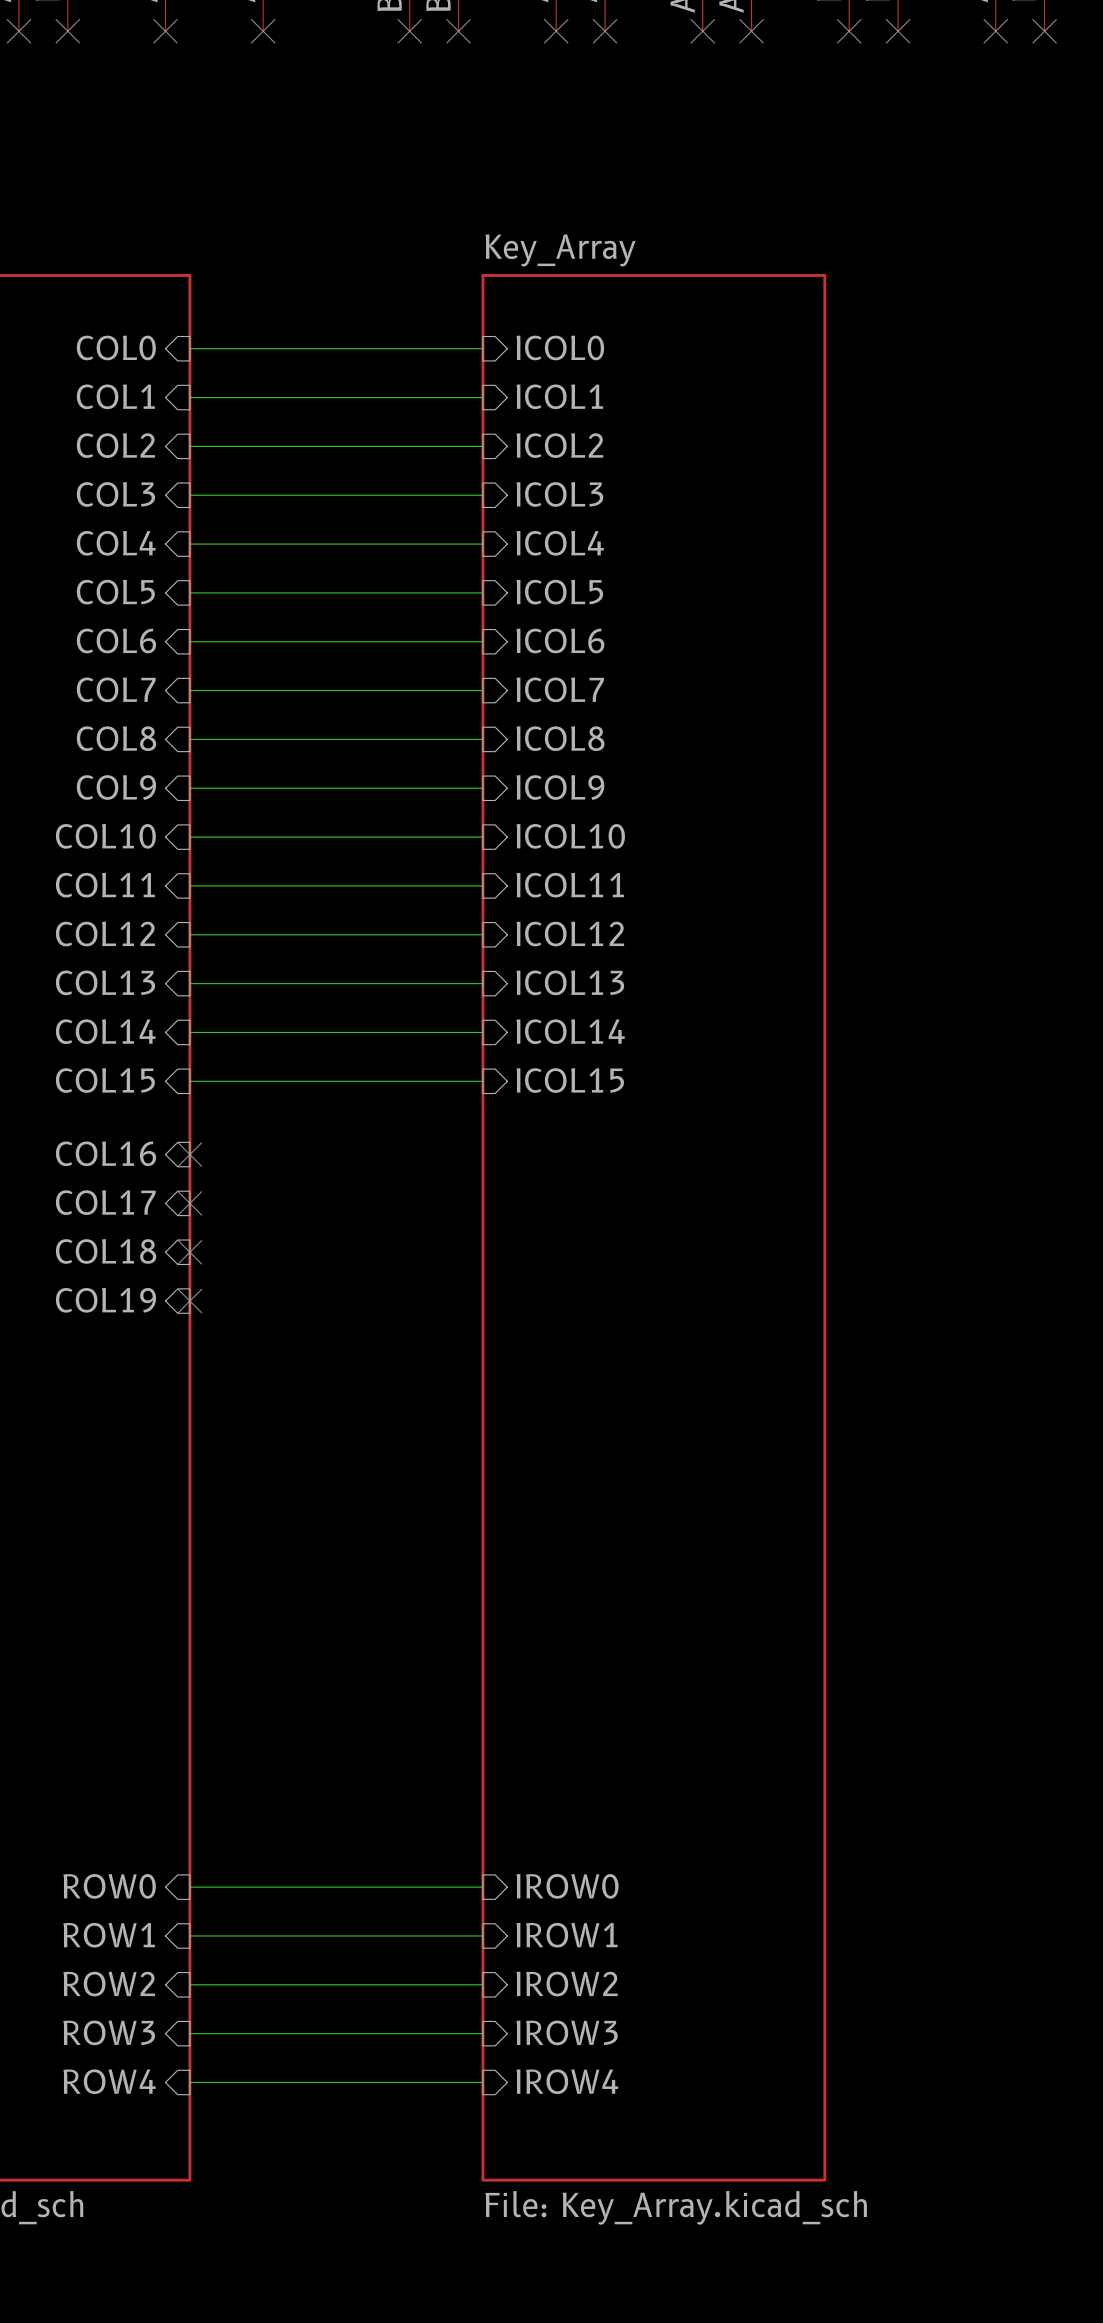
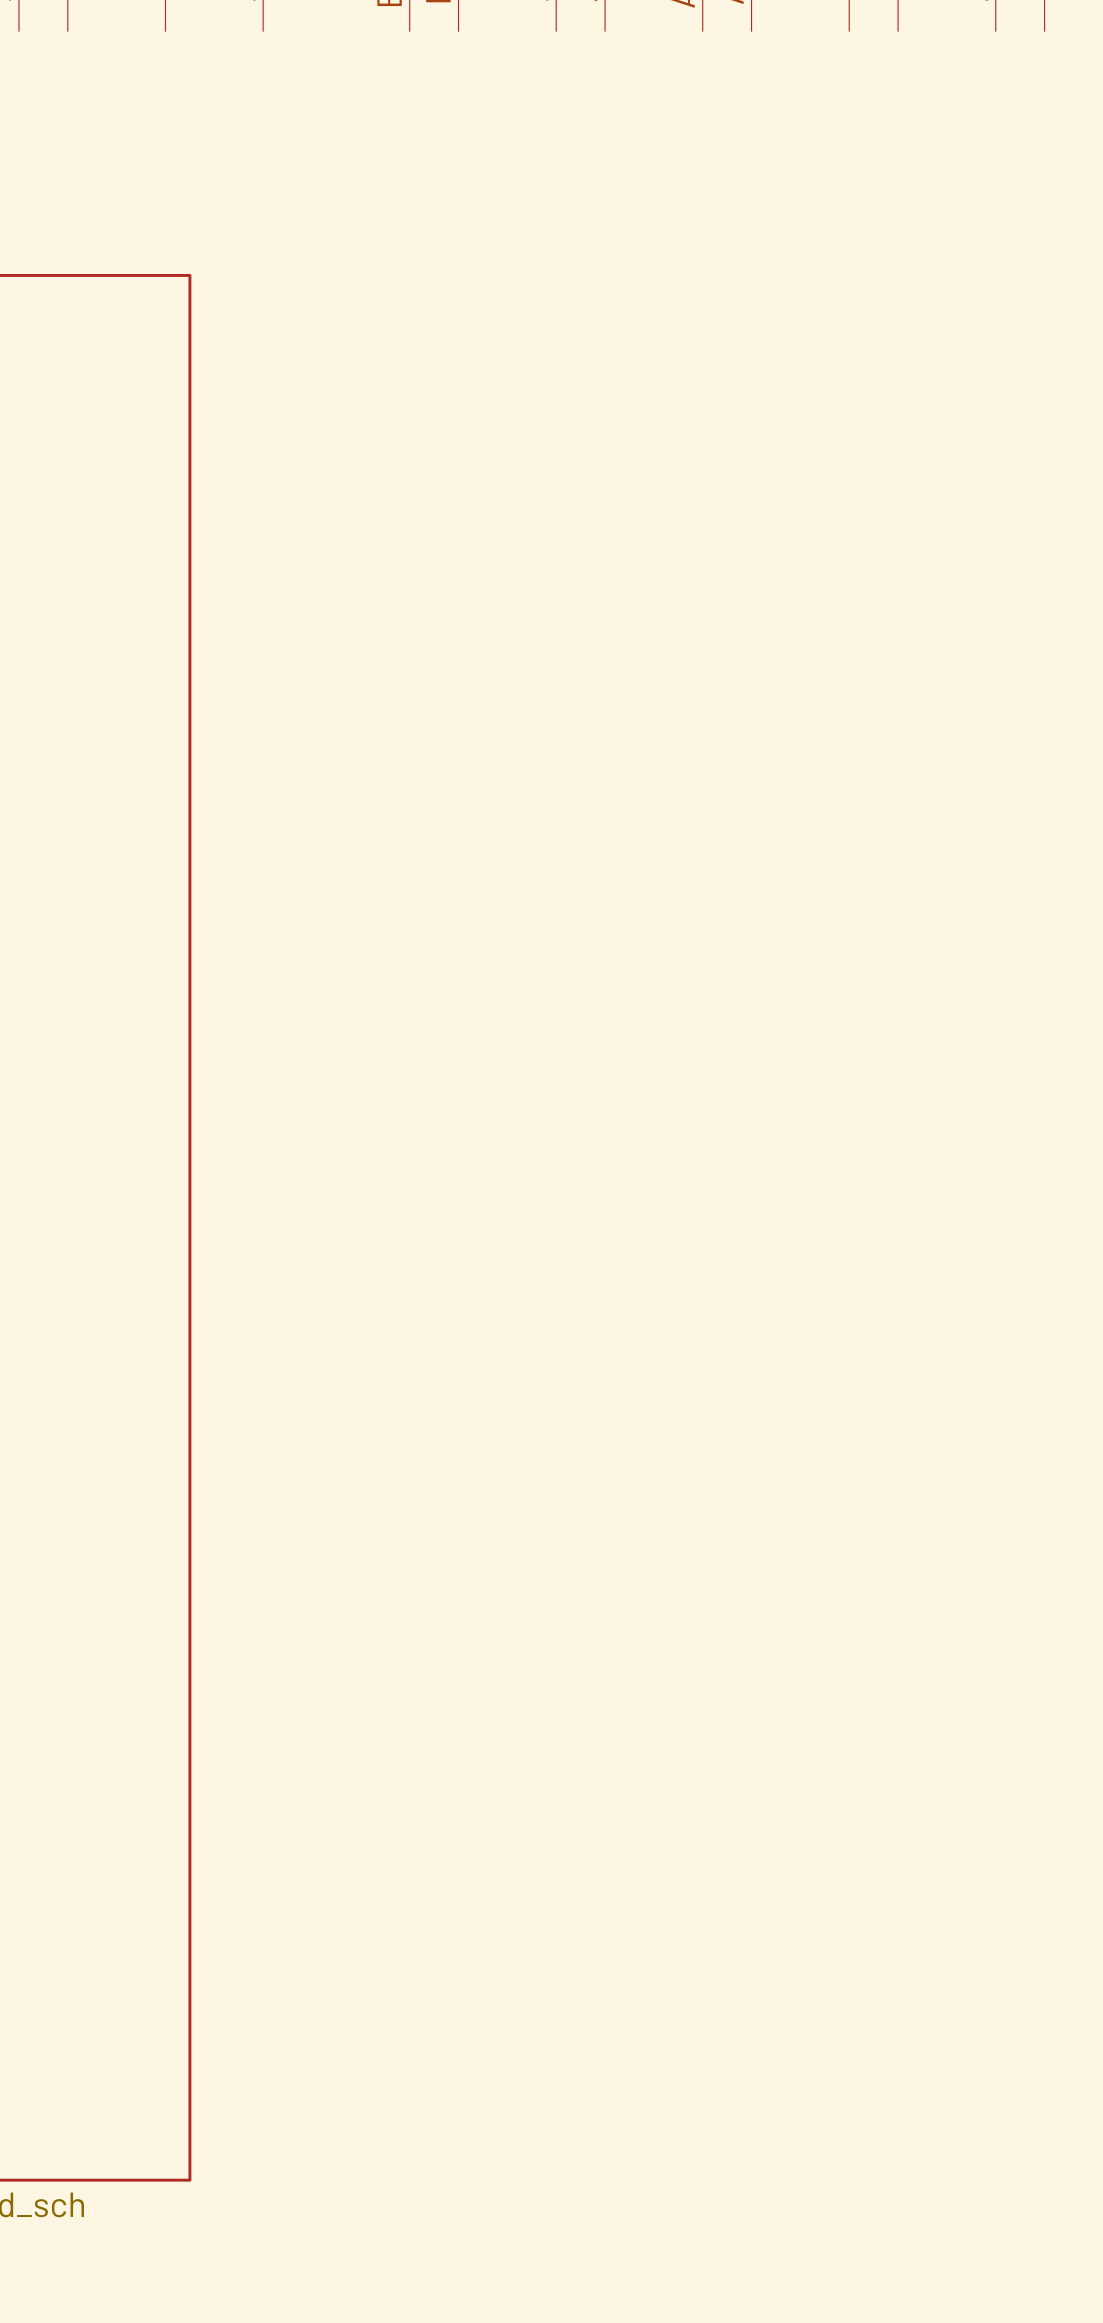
no-connect mark: (18, 31) -> none
no-connect mark: (67, 31) -> none
no-connect mark: (165, 31) -> none
no-connect mark: (263, 31) -> none
no-connect mark: (409, 31) -> none
no-connect mark: (458, 31) -> none
no-connect mark: (556, 31) -> none
no-connect mark: (605, 31) -> none
no-connect mark: (702, 31) -> none
no-connect mark: (751, 31) -> none
no-connect mark: (849, 31) -> none
no-connect mark: (898, 31) -> none
no-connect mark: (995, 31) -> none
no-connect mark: (1044, 31) -> none
sheet pin: COL0 (116, 347) -> none
sheet pin: ICOL0 (560, 347) -> none
wire: (189, 348) (482, 348) -> none
sheet pin: COL1 (115, 396) -> none
sheet pin: ICOL1 (559, 396) -> none
wire: (189, 397) (482, 397) -> none
sheet pin: COL2 (115, 445) -> none
sheet pin: ICOL2 (559, 445) -> none
wire: (189, 446) (482, 446) -> none
sheet pin: COL3 (115, 494) -> none
sheet pin: ICOL3 (559, 494) -> none
wire: (189, 495) (482, 495) -> none
sheet pin: COL4 (116, 543) -> none
sheet pin: ICOL4 (560, 543) -> none
wire: (189, 544) (482, 544) -> none
sheet pin: COL5 (115, 592) -> none
wire: (189, 592) (482, 592) -> none
sheet pin: ICOL5 (559, 592) -> none
sheet pin: COL6 (116, 640) -> none
sheet pin: ICOL6 (560, 640) -> none
wire: (189, 641) (482, 641) -> none
sheet pin: COL7 (116, 689) -> none
sheet pin: ICOL7 (560, 689) -> none
wire: (189, 690) (482, 690) -> none
sheet pin: COL8 (116, 738) -> none
sheet pin: ICOL8 (560, 738) -> none
wire: (189, 739) (482, 739) -> none
sheet pin: COL9 (116, 787) -> none
sheet pin: ICOL9 (560, 787) -> none
wire: (189, 788) (482, 788) -> none
sheet pin: COL10 (105, 836) -> none
sheet pin: ICOL10 (570, 836) -> none
wire: (189, 837) (482, 837) -> none
sheet pin: COL11 (105, 885) -> none
wire: (189, 885) (482, 885) -> none
sheet pin: ICOL11 (570, 885) -> none
sheet pin: COL12 (105, 934) -> none
wire: (189, 934) (482, 934) -> none
sheet pin: ICOL12 (570, 934) -> none
sheet pin: COL13 (105, 982) -> none
sheet pin: ICOL13 (570, 982) -> none
wire: (189, 983) (482, 983) -> none
sheet pin: COL14 (105, 1031) -> none
sheet pin: ICOL14 (570, 1031) -> none
wire: (189, 1032) (482, 1032) -> none
sheet pin: COL15 (105, 1080) -> none
sheet pin: ICOL15 (570, 1080) -> none
wire: (189, 1081) (482, 1081) -> none
sheet pin: COL16 (106, 1153) -> none
no-connect mark: (189, 1154) -> none
sheet pin: COL17 (105, 1202) -> none
no-connect mark: (189, 1203) -> none
sheet Key_Array: File: Key_Array.kicad_sch (653, 1227) -> none
sheet pin: COL18 (106, 1251) -> none
no-connect mark: (189, 1252) -> none
sheet pin: COL19 (105, 1300) -> none
no-connect mark: (189, 1301) -> none
sheet pin: ROW0 (109, 1886) -> none
sheet pin: IROW0 (567, 1886) -> none
wire: (189, 1887) (482, 1887) -> none
sheet pin: ROW1 (109, 1935) -> none
wire: (189, 1935) (482, 1935) -> none
sheet pin: IROW1 (567, 1935) -> none
sheet pin: ROW2 (109, 1984) -> none
wire: (189, 1984) (482, 1984) -> none
sheet pin: IROW2 (567, 1984) -> none
sheet pin: ROW3 (109, 2032) -> none
sheet pin: IROW3 (567, 2032) -> none
wire: (189, 2033) (482, 2033) -> none
sheet pin: ROW4 (109, 2081) -> none
sheet pin: IROW4 (567, 2081) -> none
wire: (189, 2082) (482, 2082) -> none

